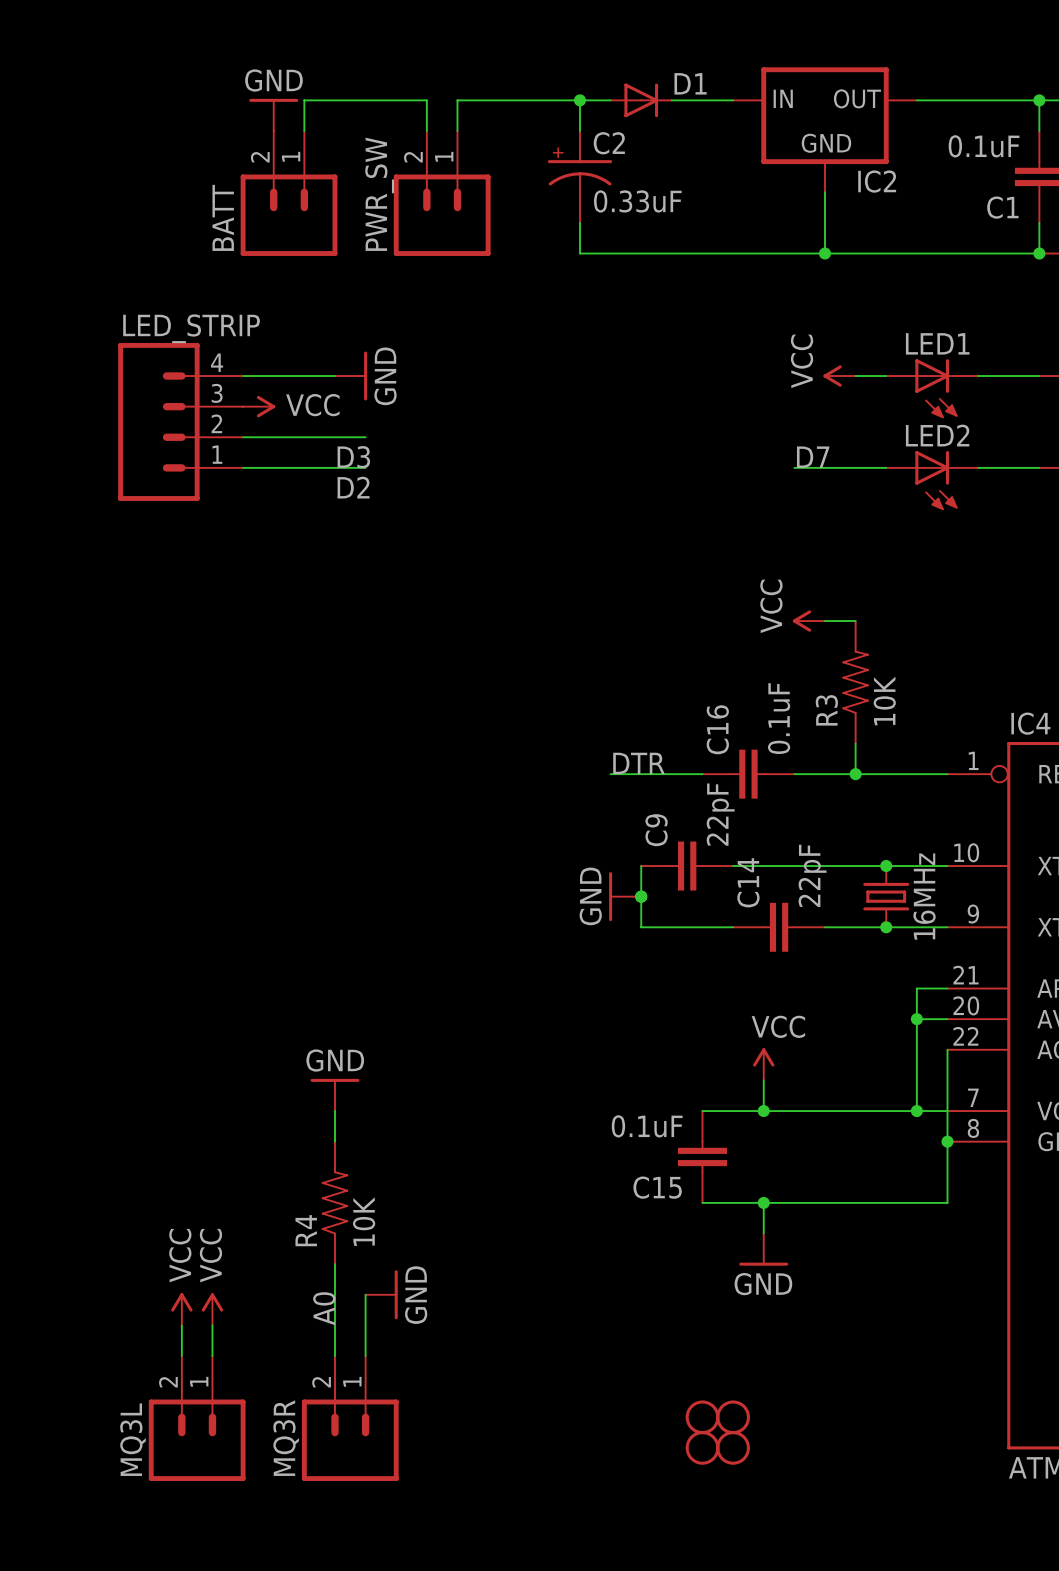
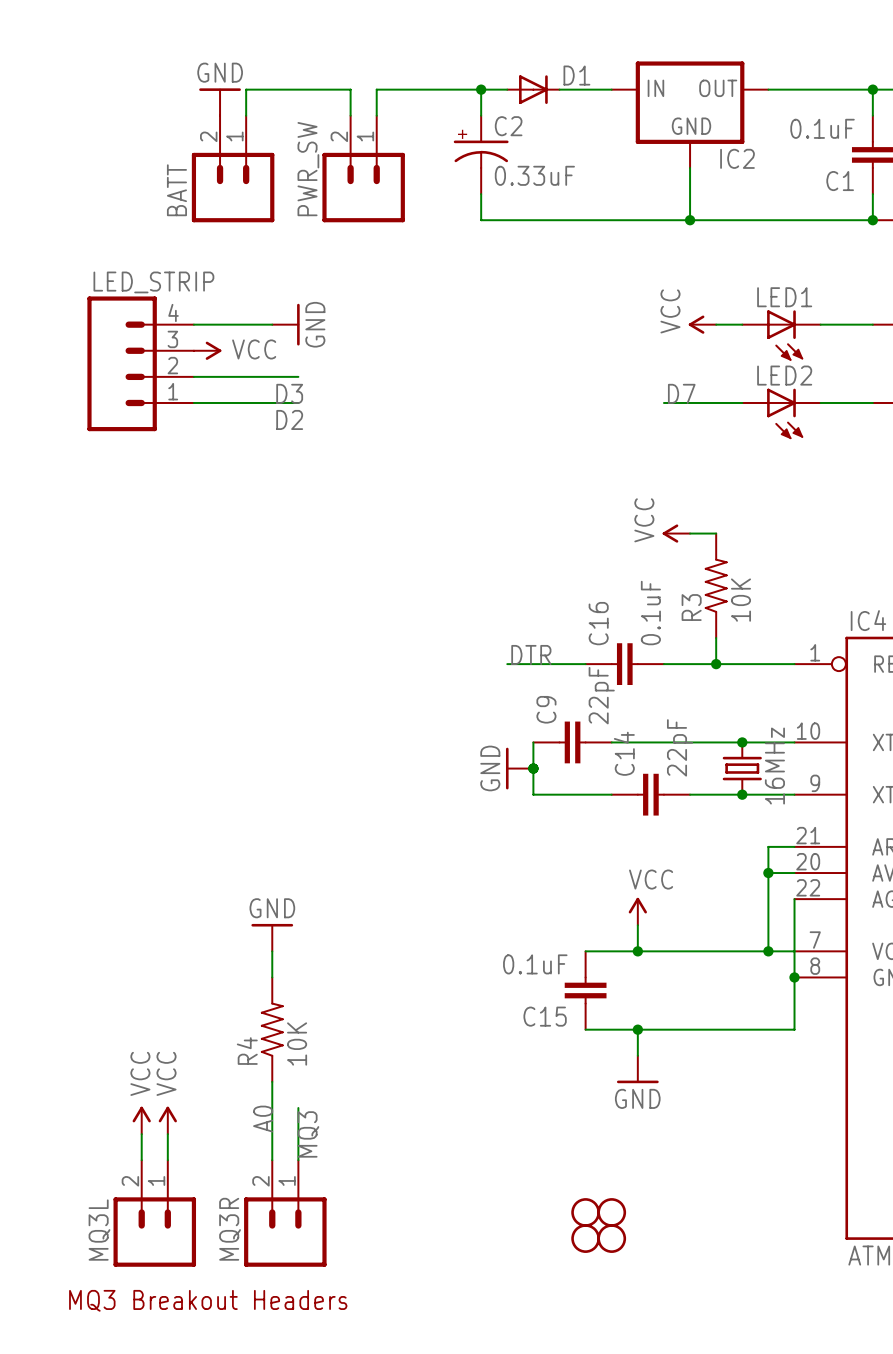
power symbol: GND (381, 1294) -> none
label: none -> MQ3 (308, 1134)
text: none -> MQ3 Breakout Headers (208, 1300)

